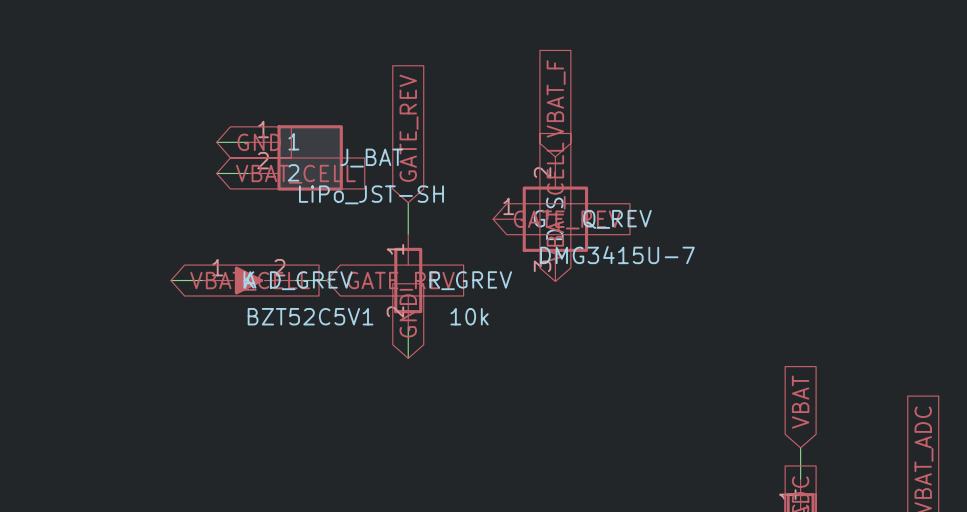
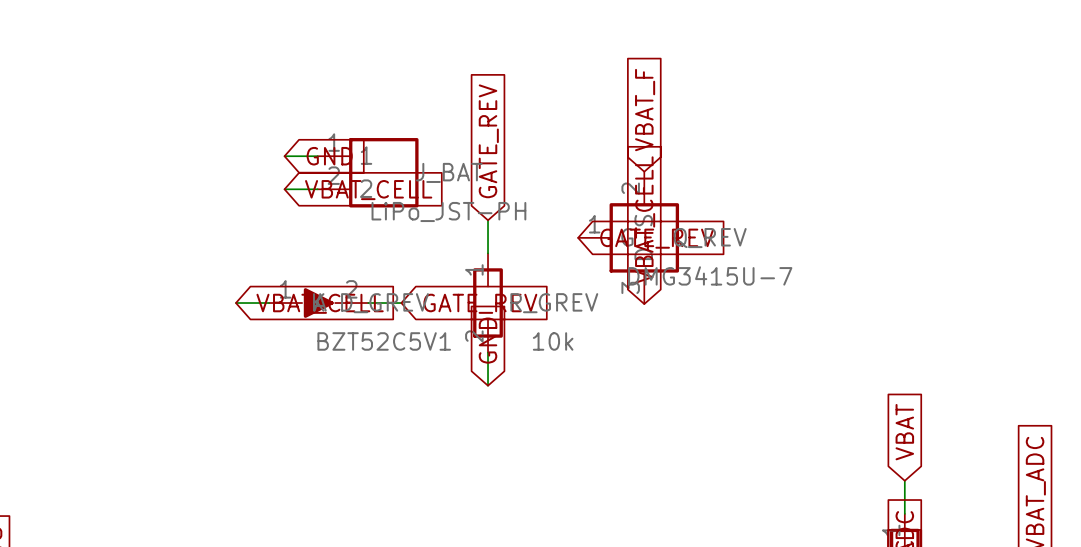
J_BAT value: LiPo_JST-SH (371, 194) -> LiPo_JST-PH (448, 212)

